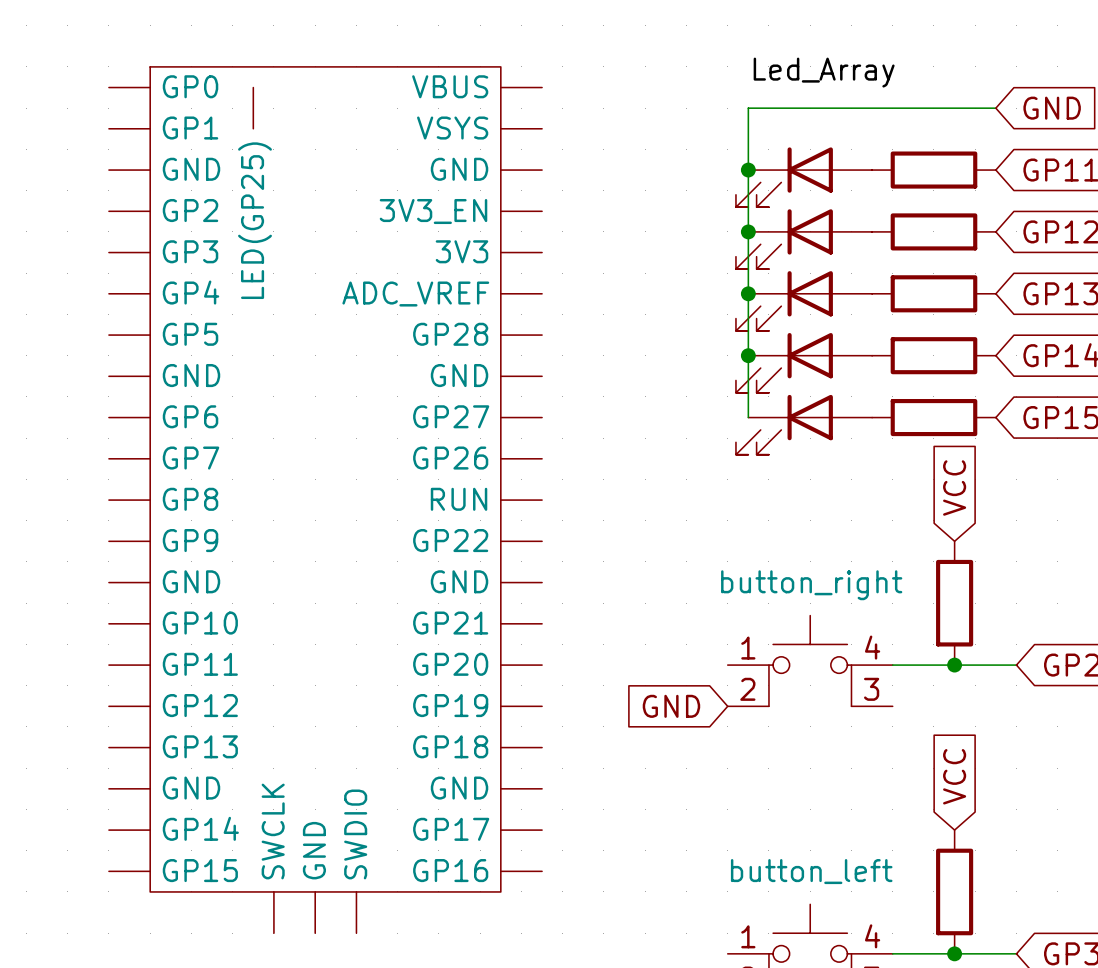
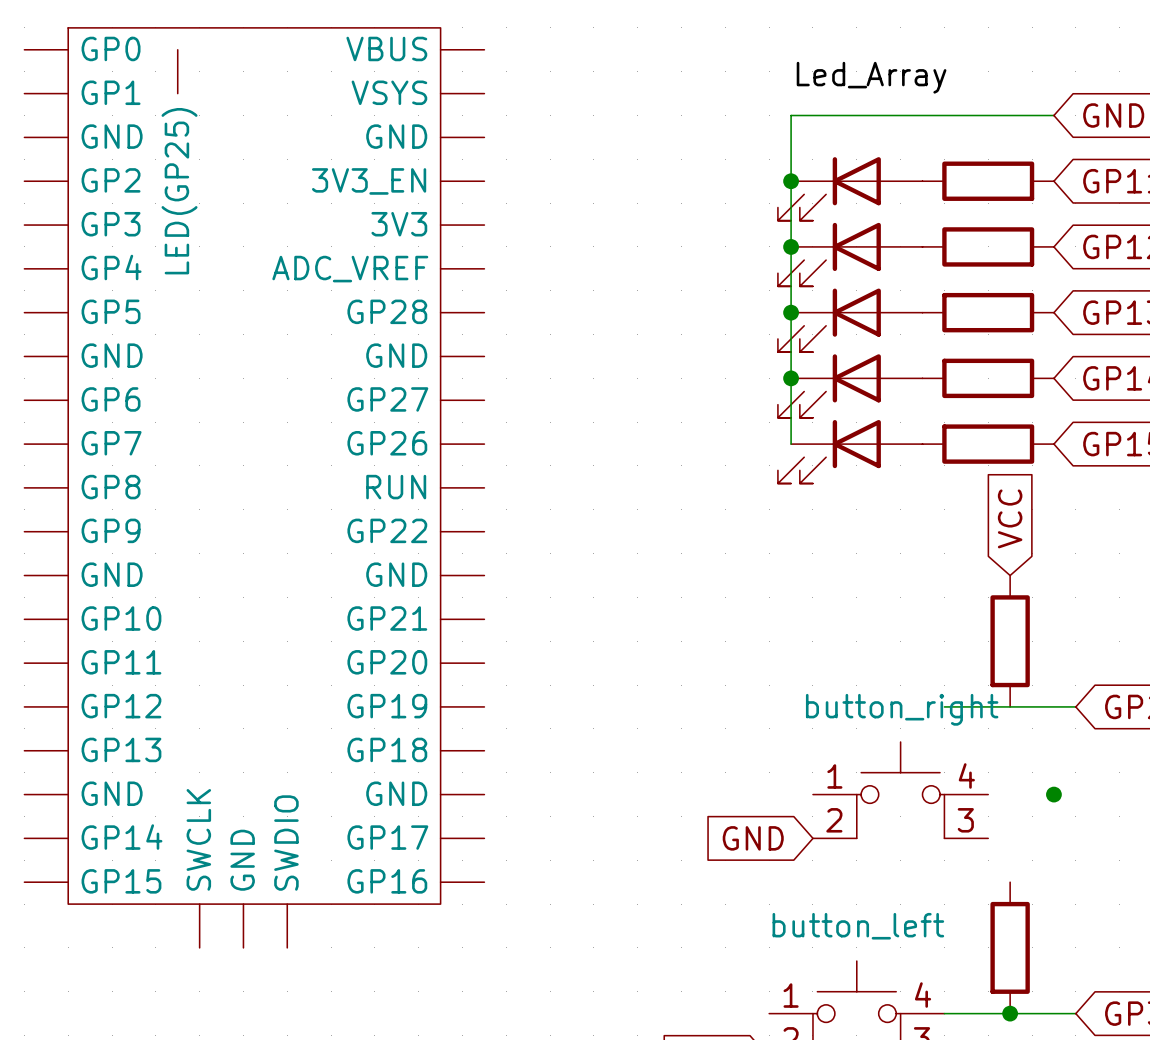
part position: (325, 500) -> (254, 487)
button_right position: (810, 660) -> (900, 790)
junction position: (954, 665) -> (1053, 794)
global label position: GND (671, 706) -> GND (753, 838)
global label: VCC (954, 776) -> none

